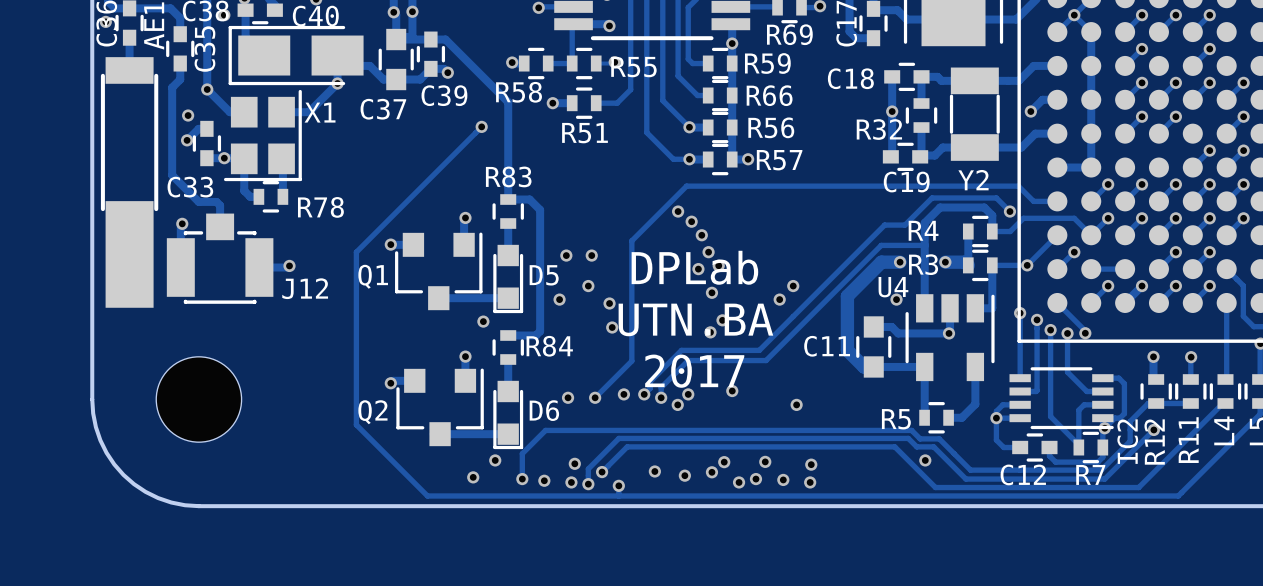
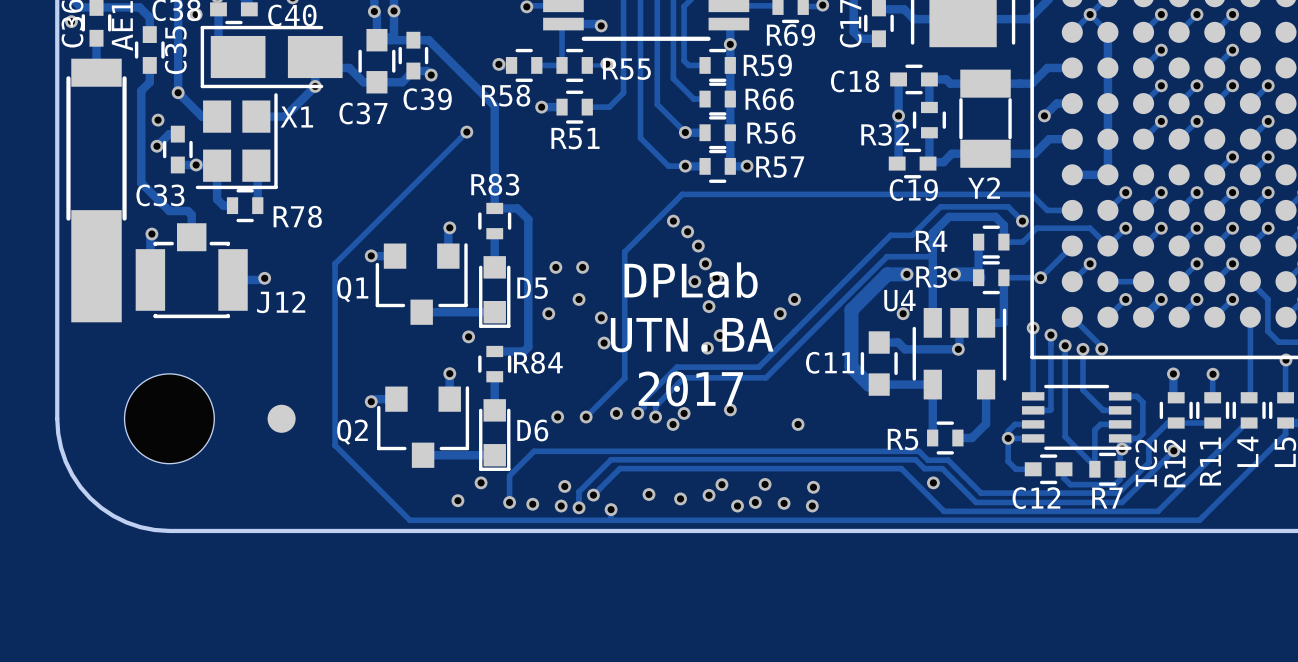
part: none -> (281, 418)

